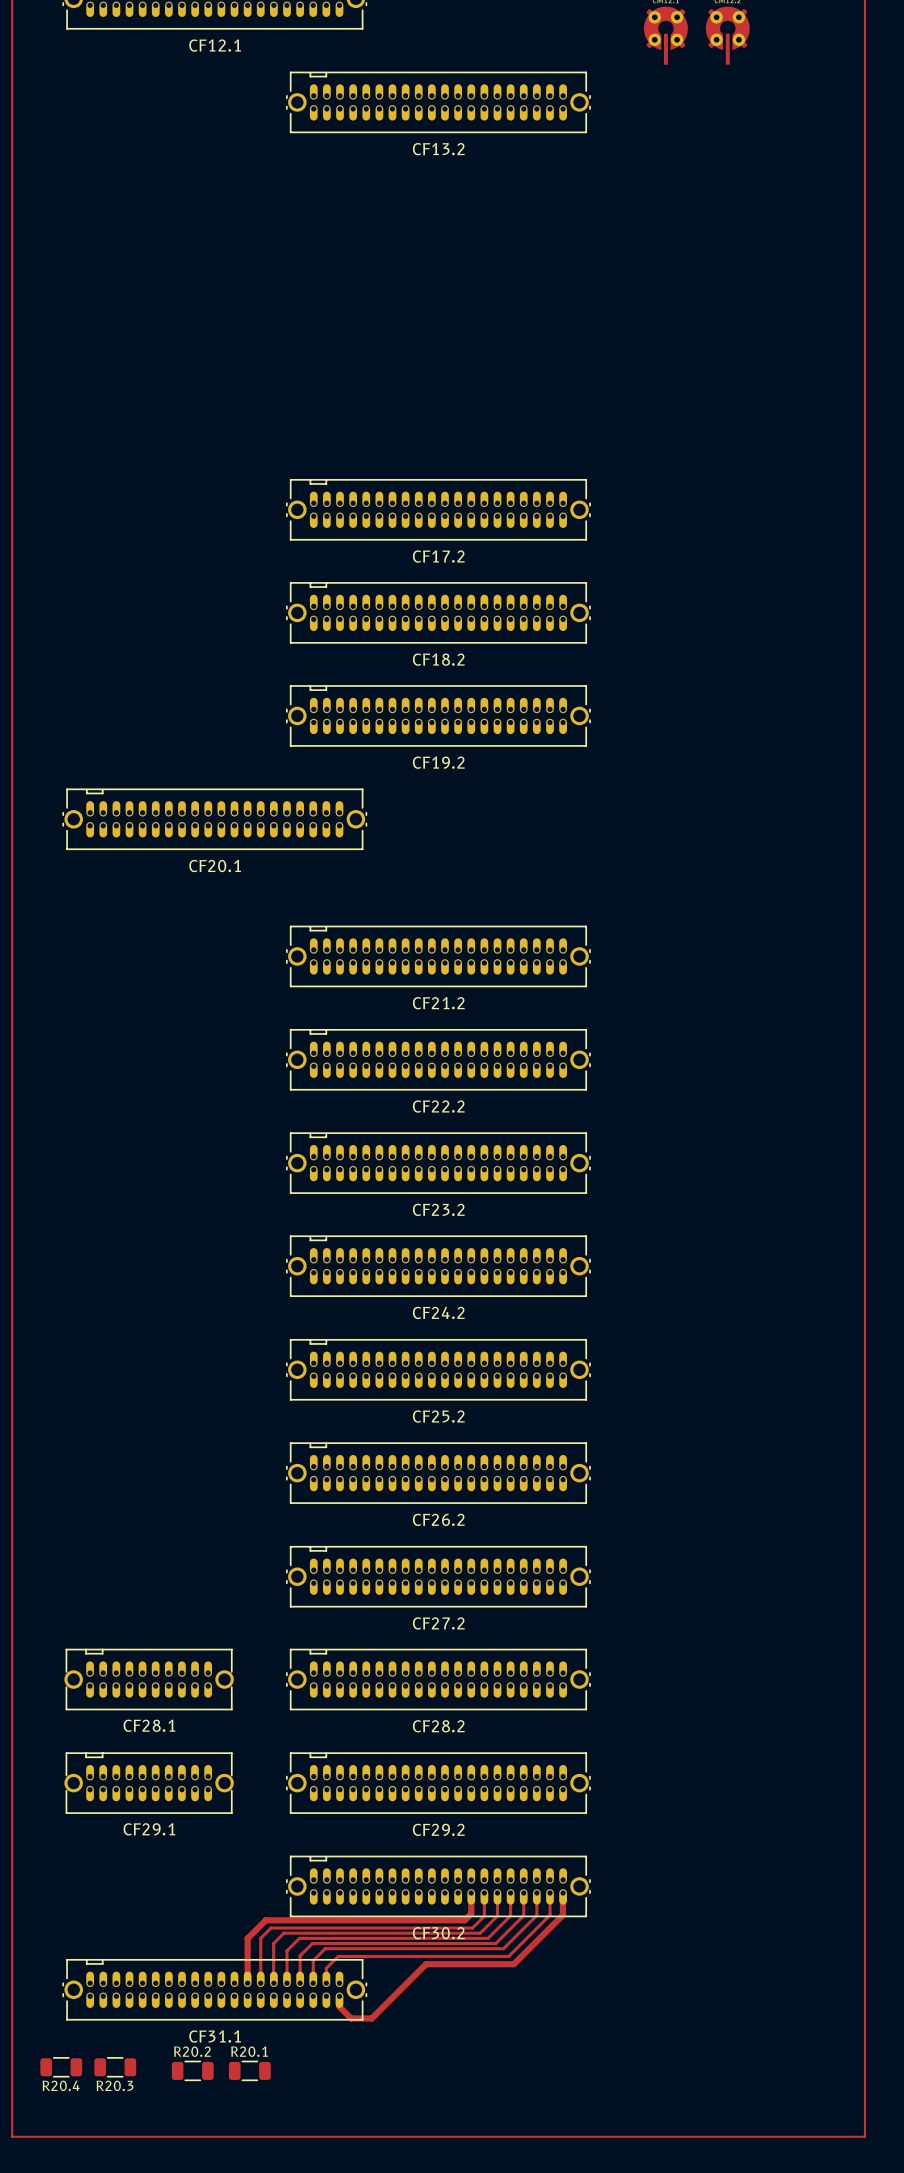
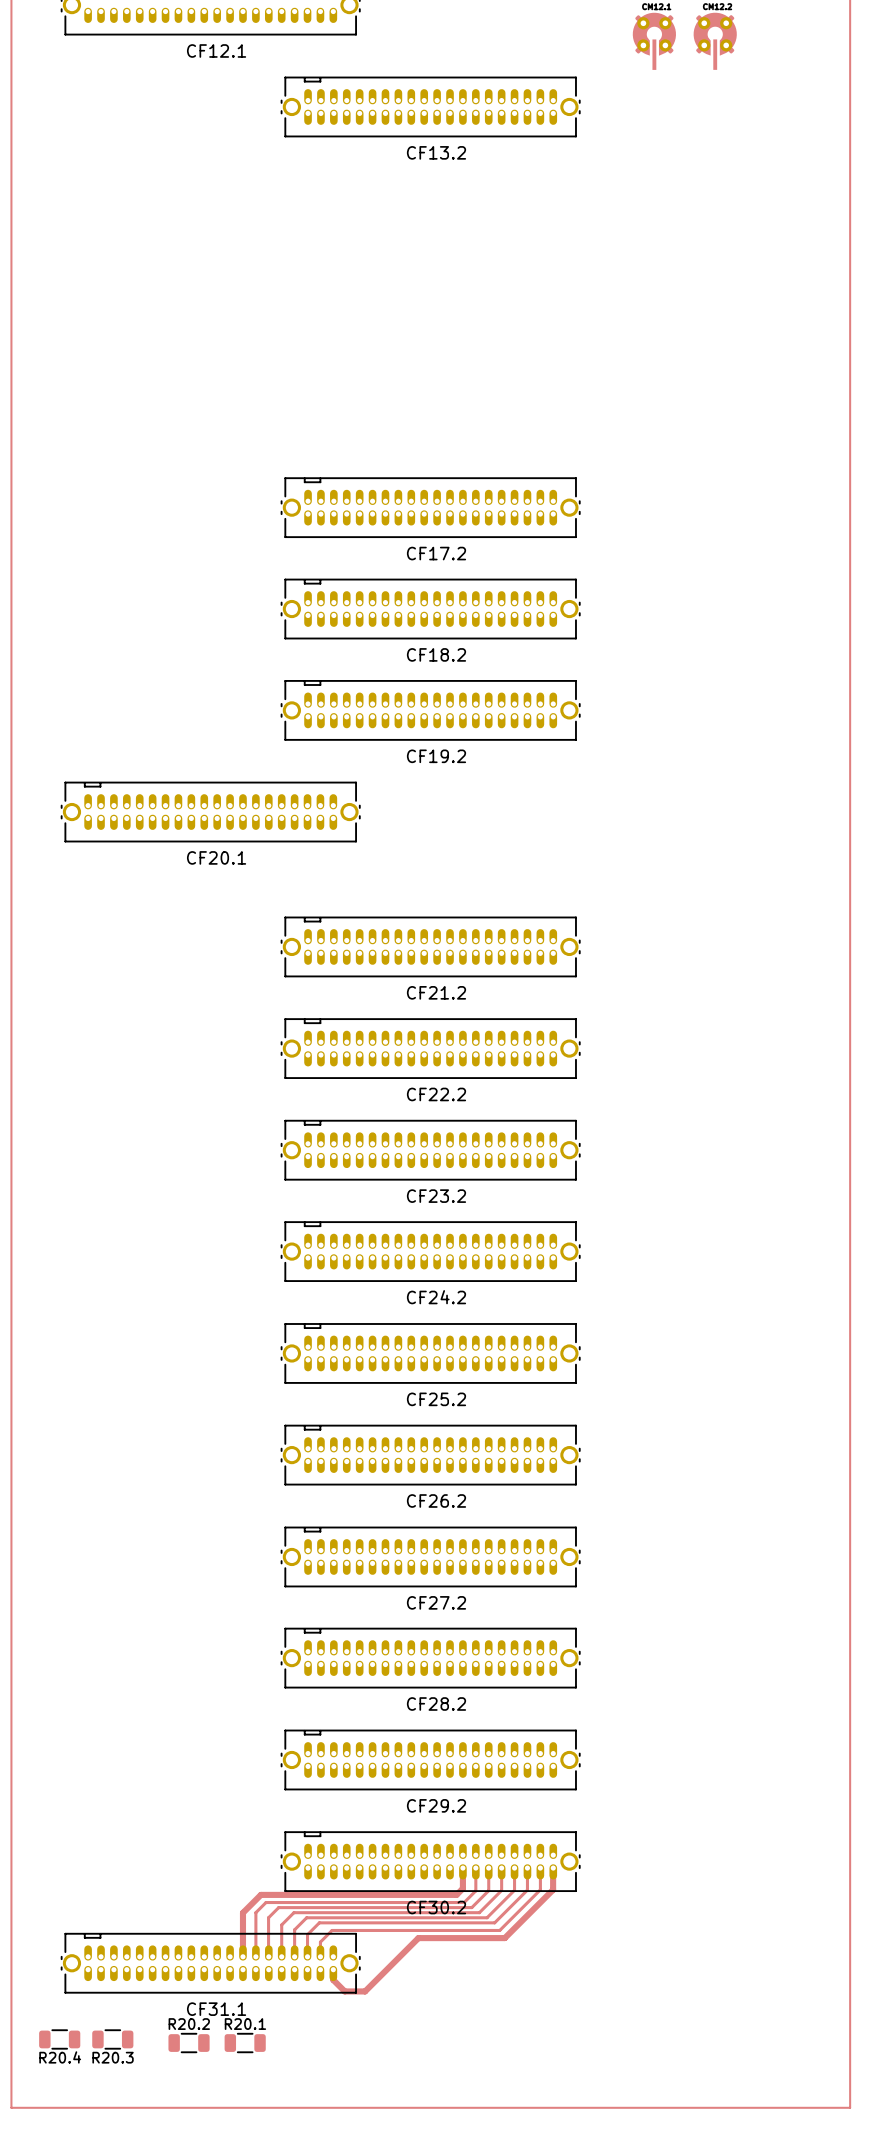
CF28.1: (149, 1679) -> none
CF29.1: (149, 1783) -> none

